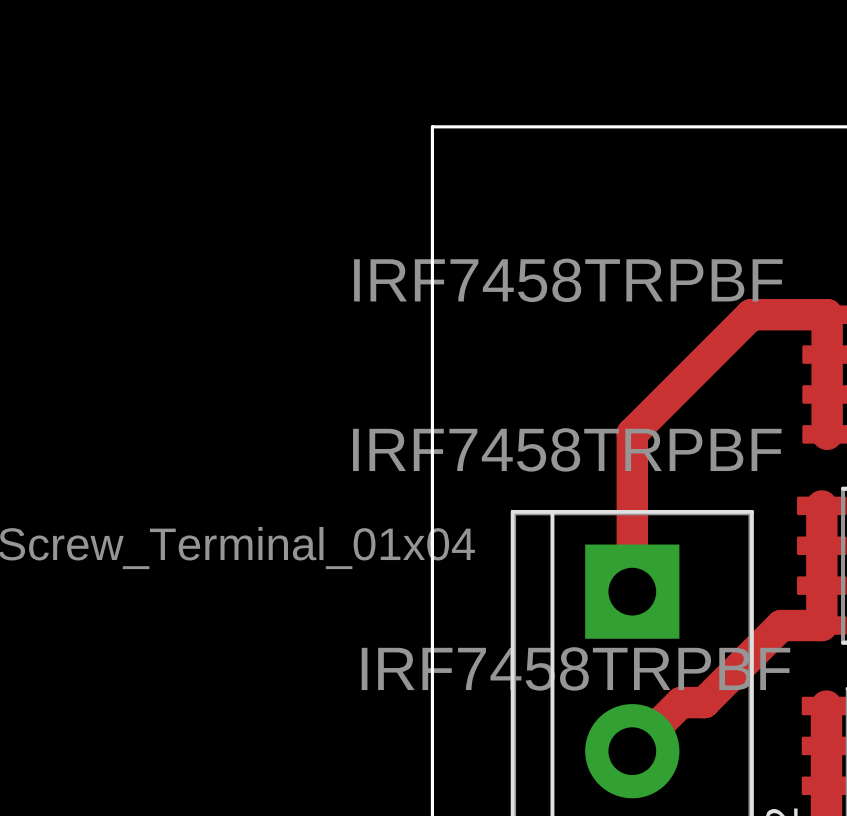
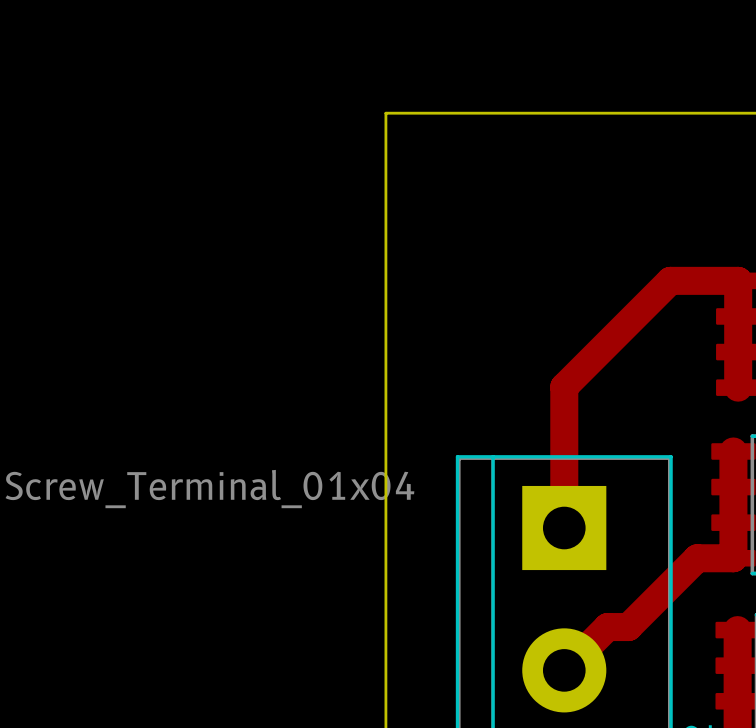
part value: IRF7458TRPBF (568, 280) -> none
part value: IRF7458TRPBF (567, 449) -> none
part value: IRF7458TRPBF (575, 668) -> none

